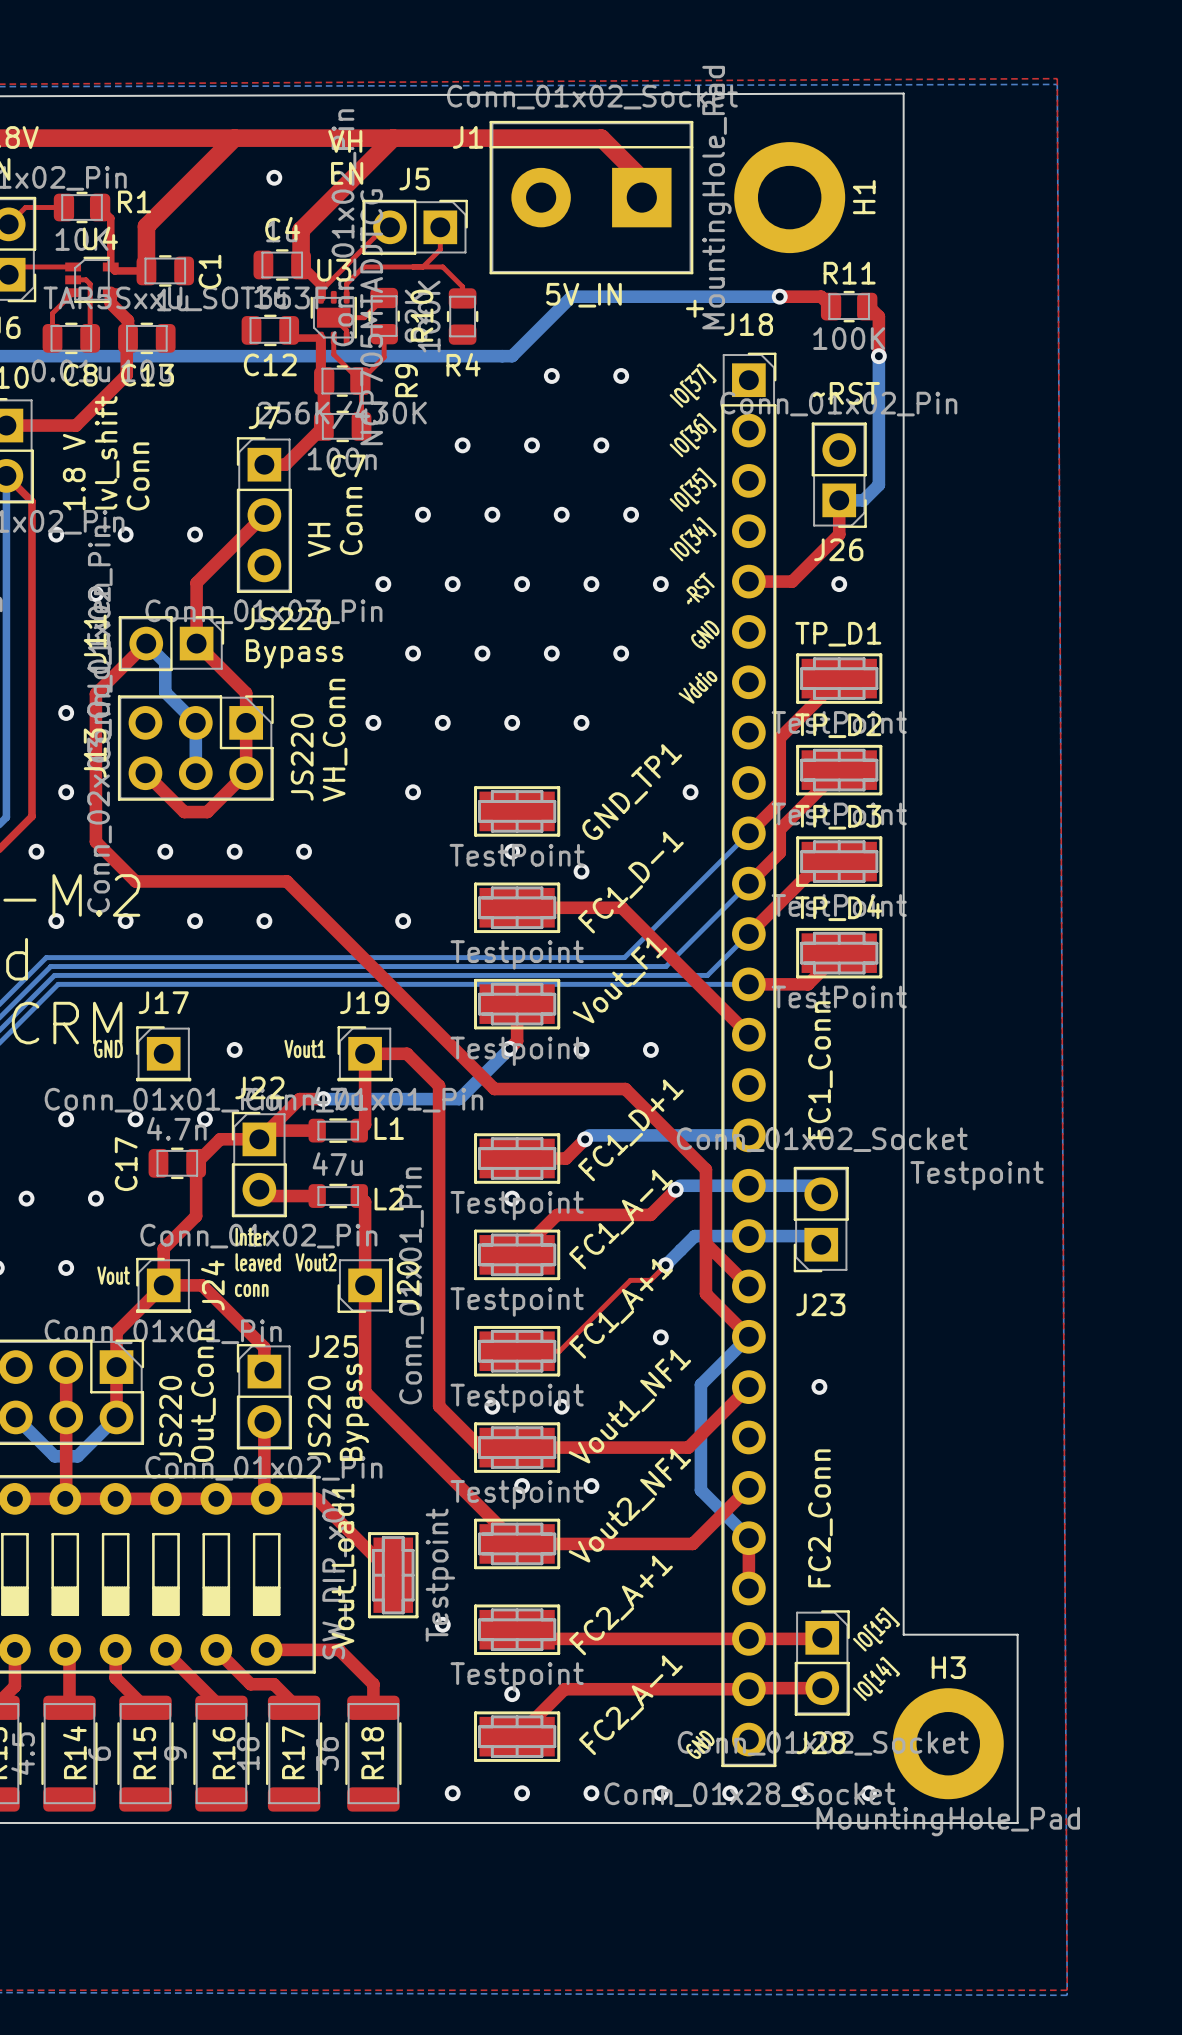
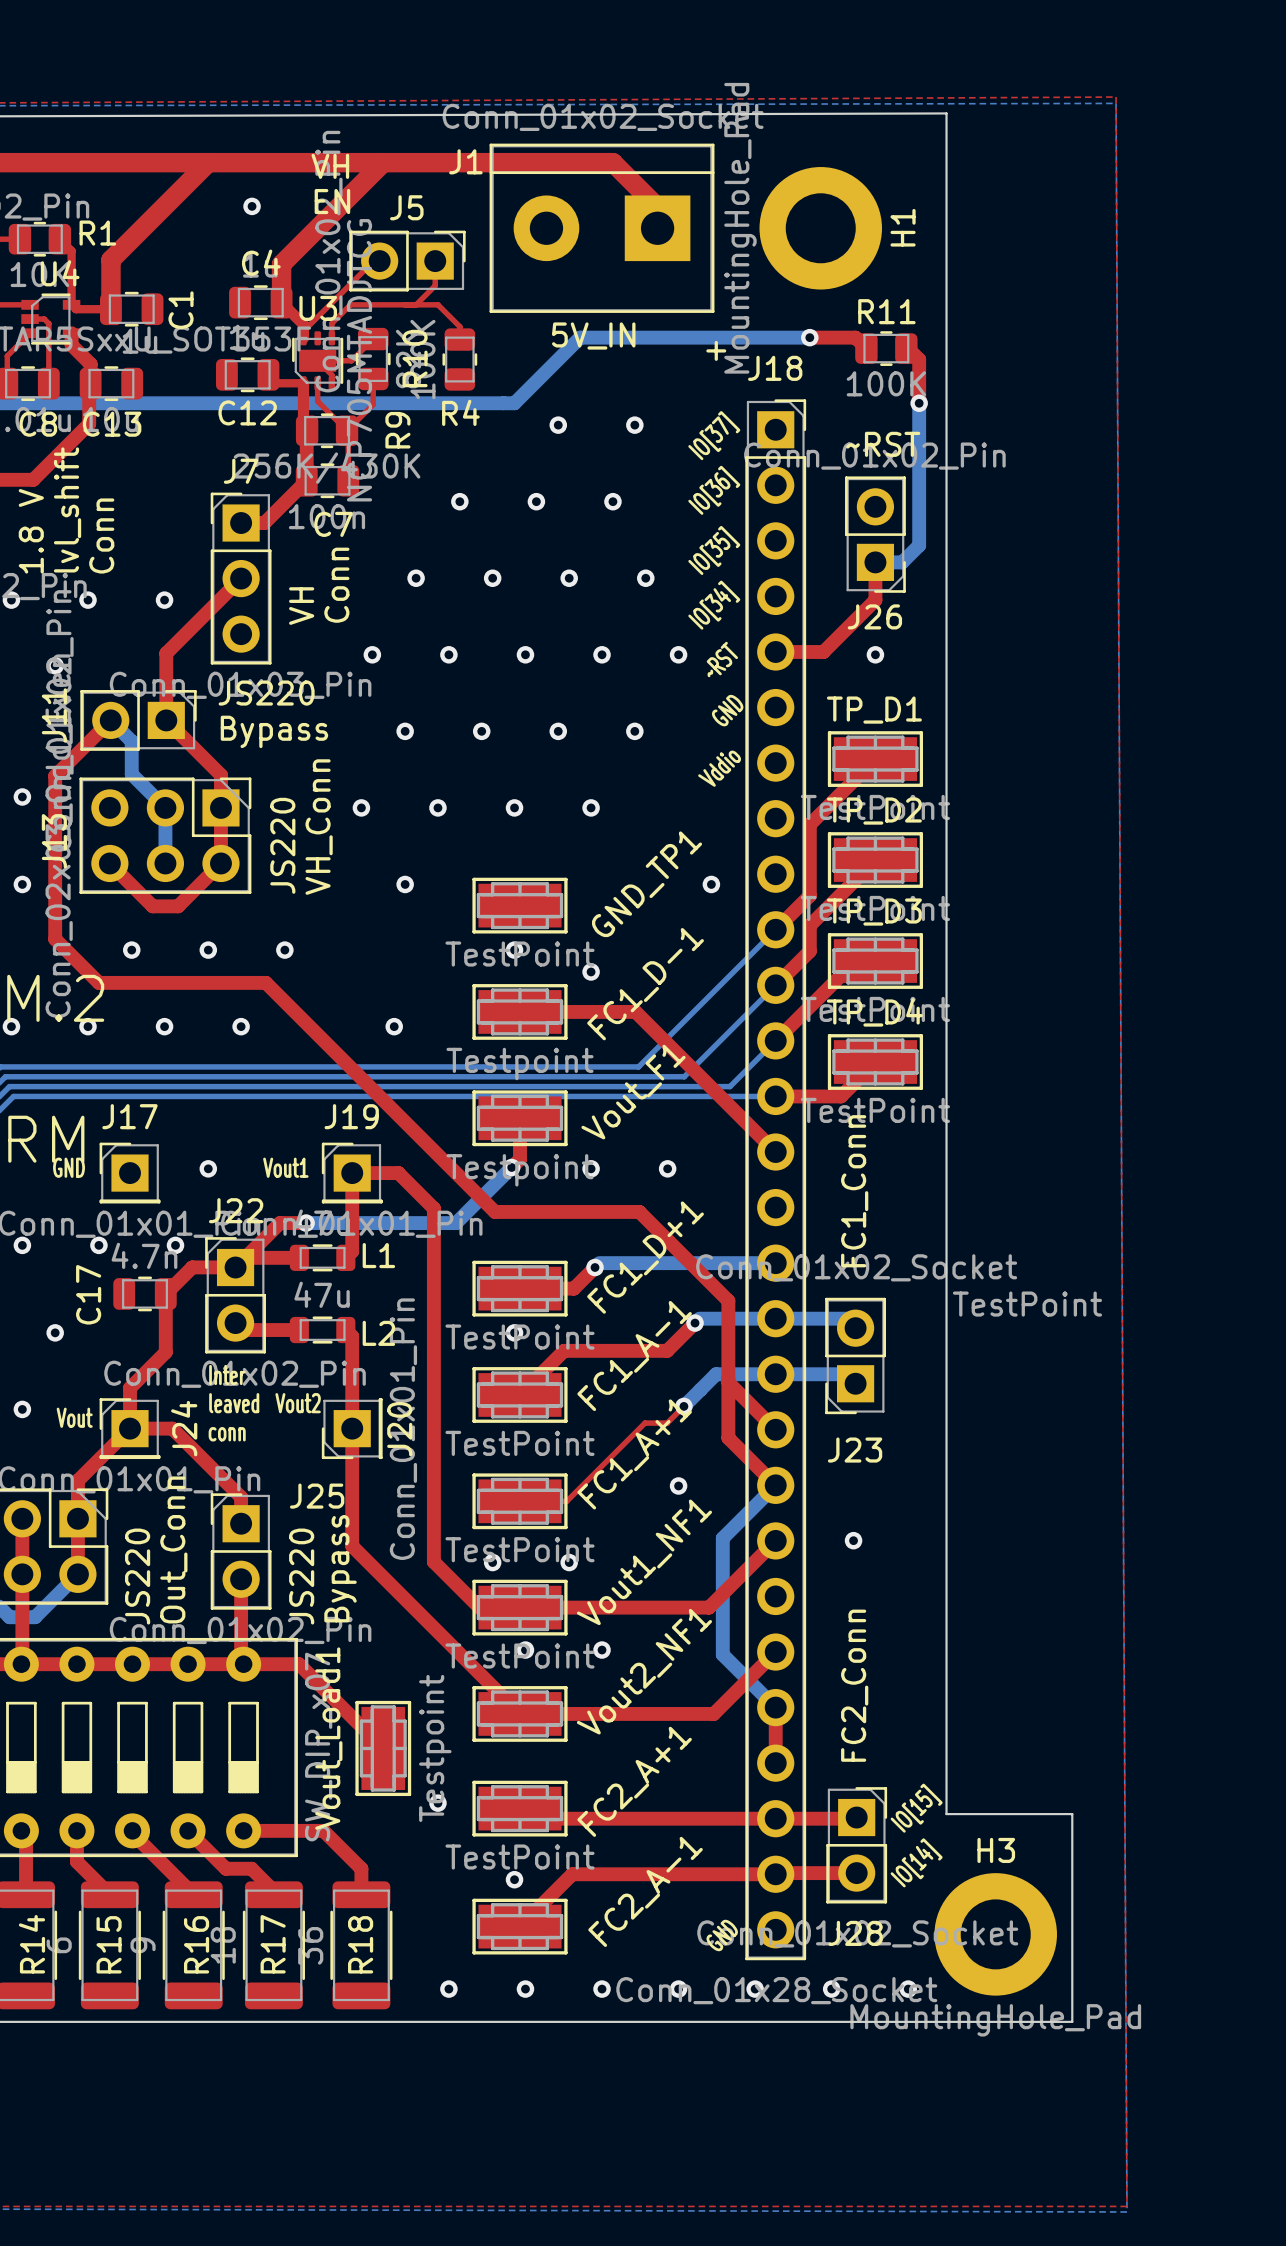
part value: Testpoint (977, 1175) -> TestPoint (1027, 1304)
FC1_D+1 value: Testpoint (517, 1205) -> TestPoint (519, 1337)
FC1_A-1 value: Testpoint (517, 1302) -> TestPoint (519, 1443)
FC1_A+1 value: Testpoint (517, 1398) -> TestPoint (519, 1549)
Vout1_NF1 value: Testpoint (517, 1494) -> TestPoint (519, 1656)
FC2_A+1 value: Testpoint (517, 1676) -> TestPoint (519, 1857)

